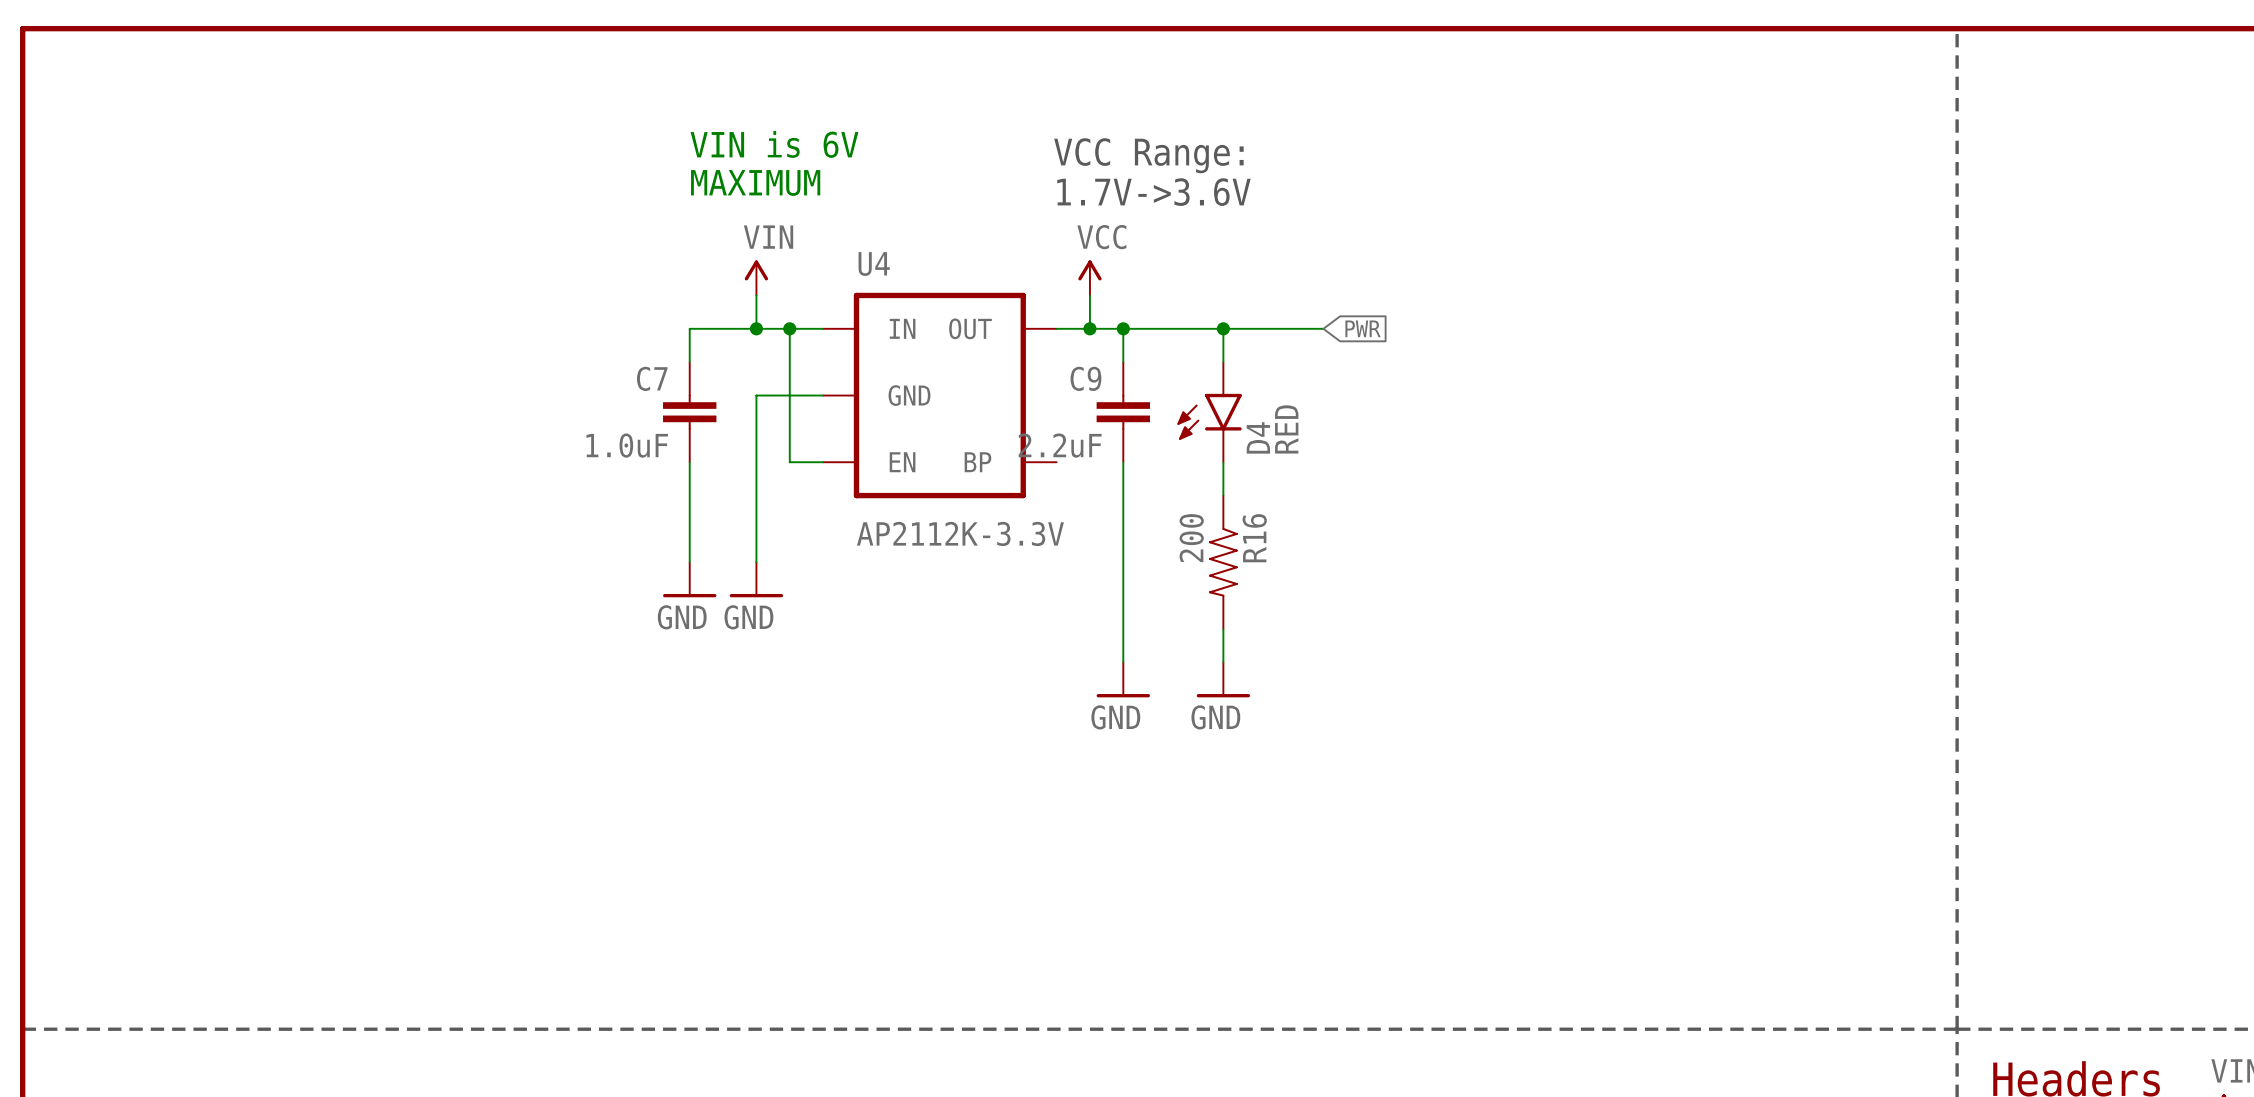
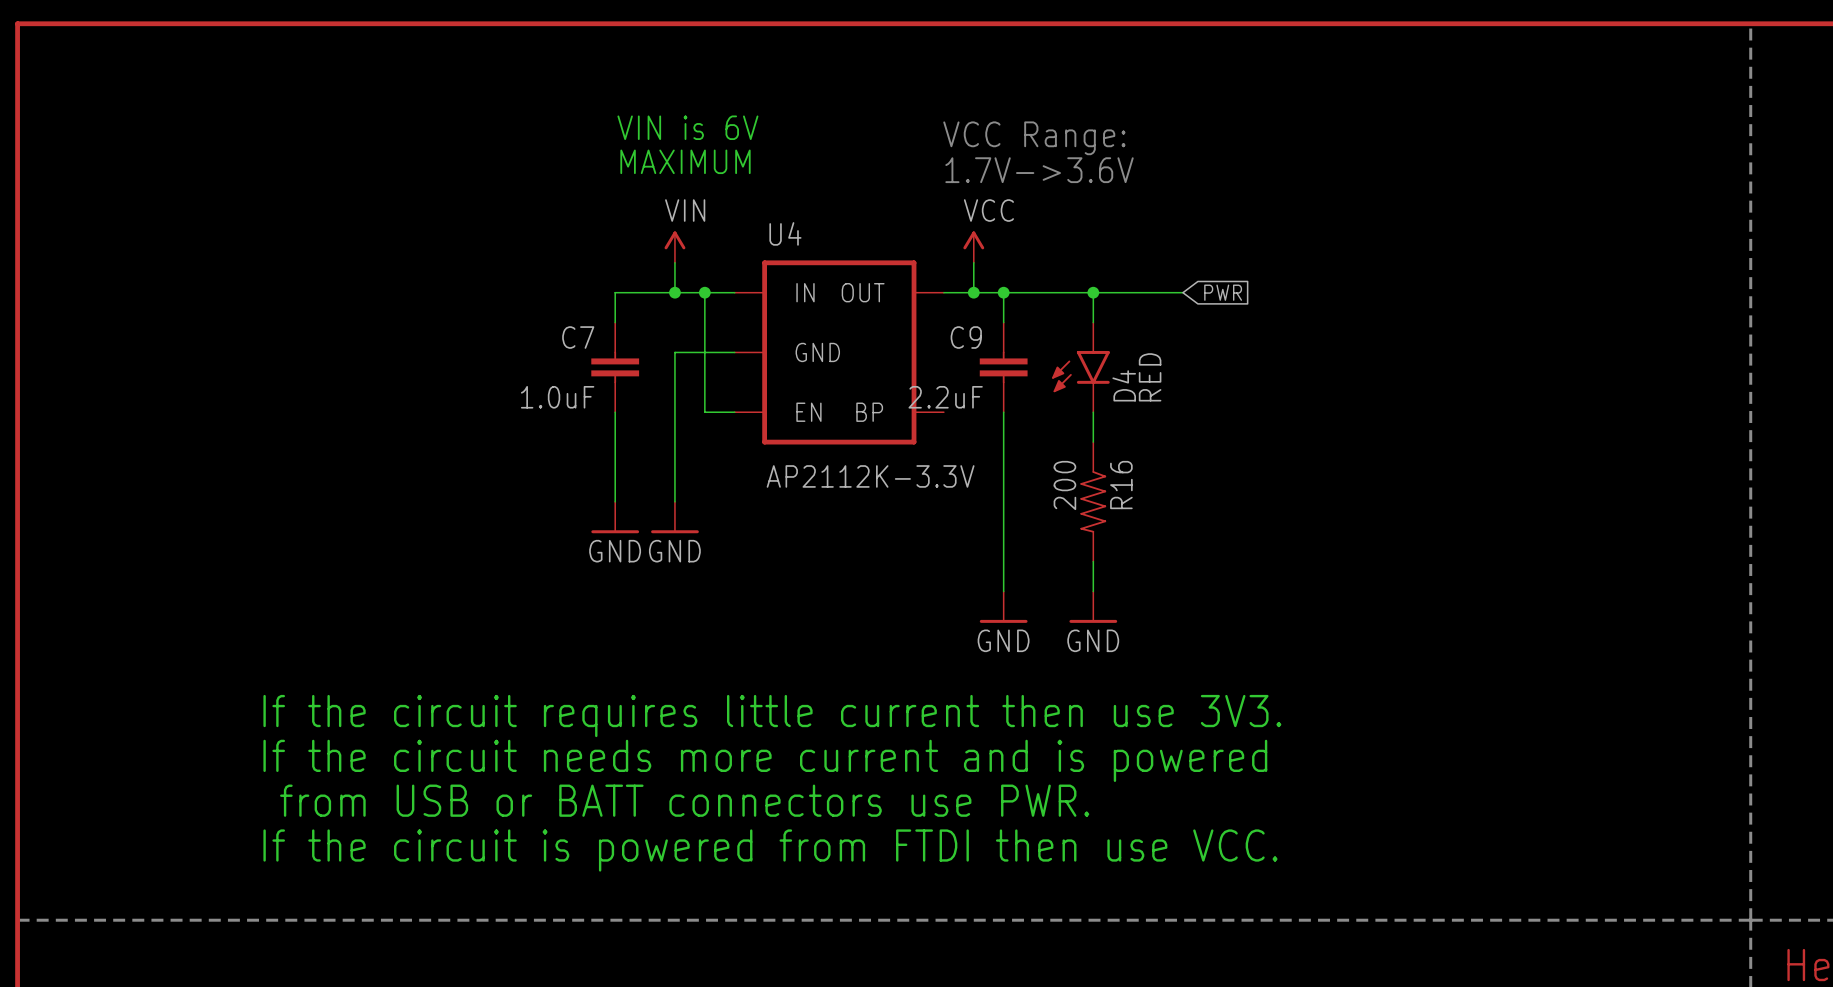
text: none -> If the circuit requires little current then use 3V3. (772, 716)
text: none -> If the circuit needs more current and is powered (765, 760)
text: none -> from USB or BATT connectors use PWR. (684, 800)
text: none -> If the circuit is powered from FTDI then use VCC. (770, 850)

